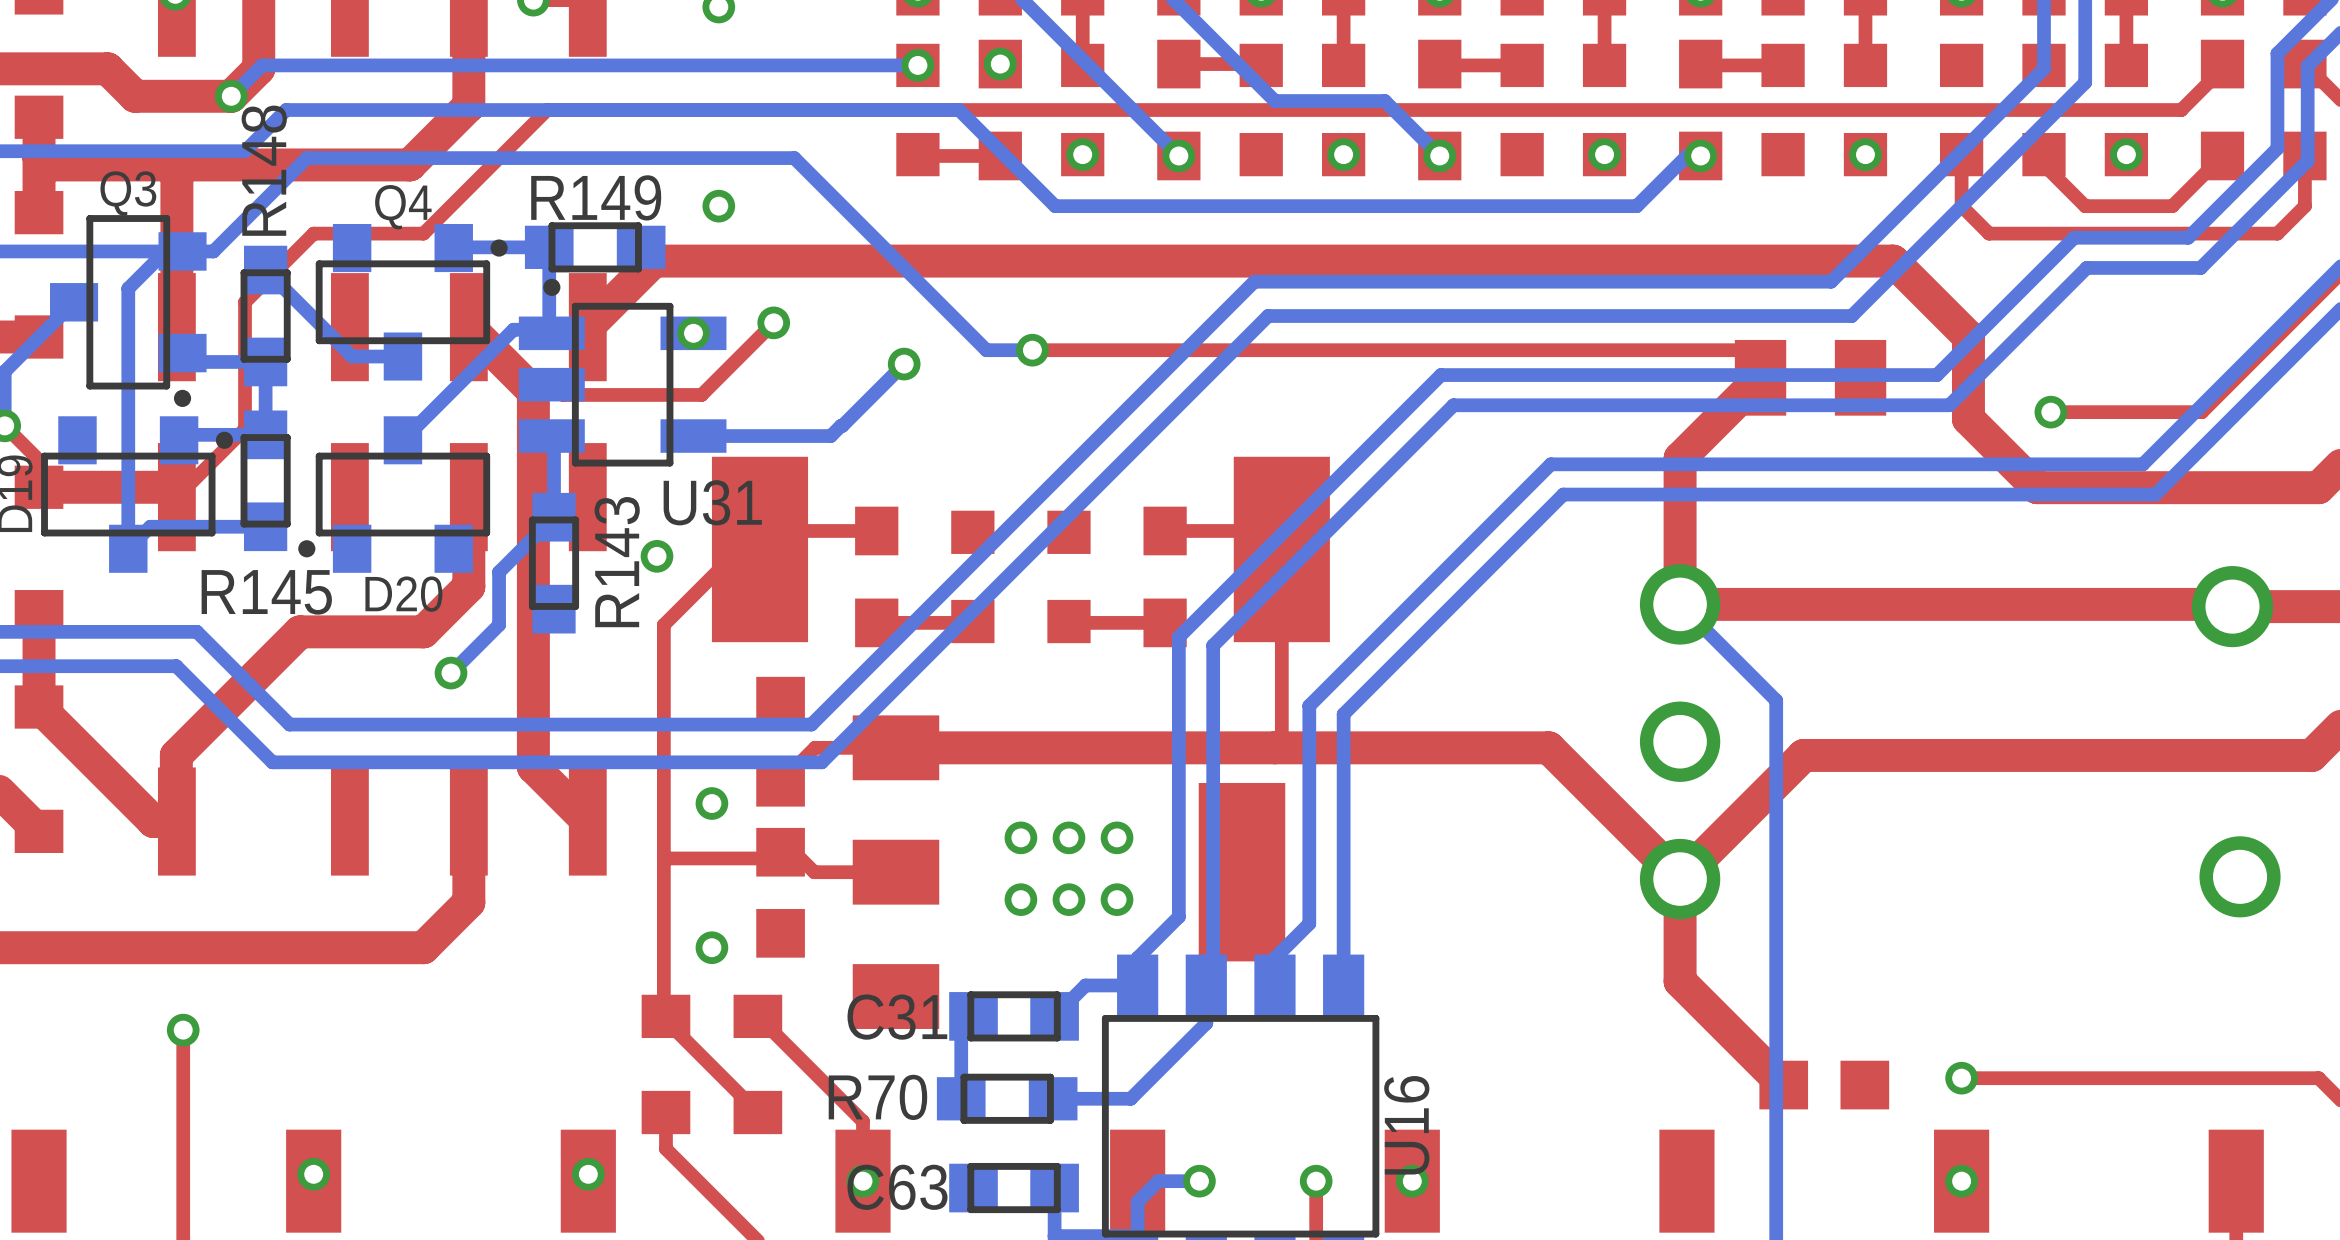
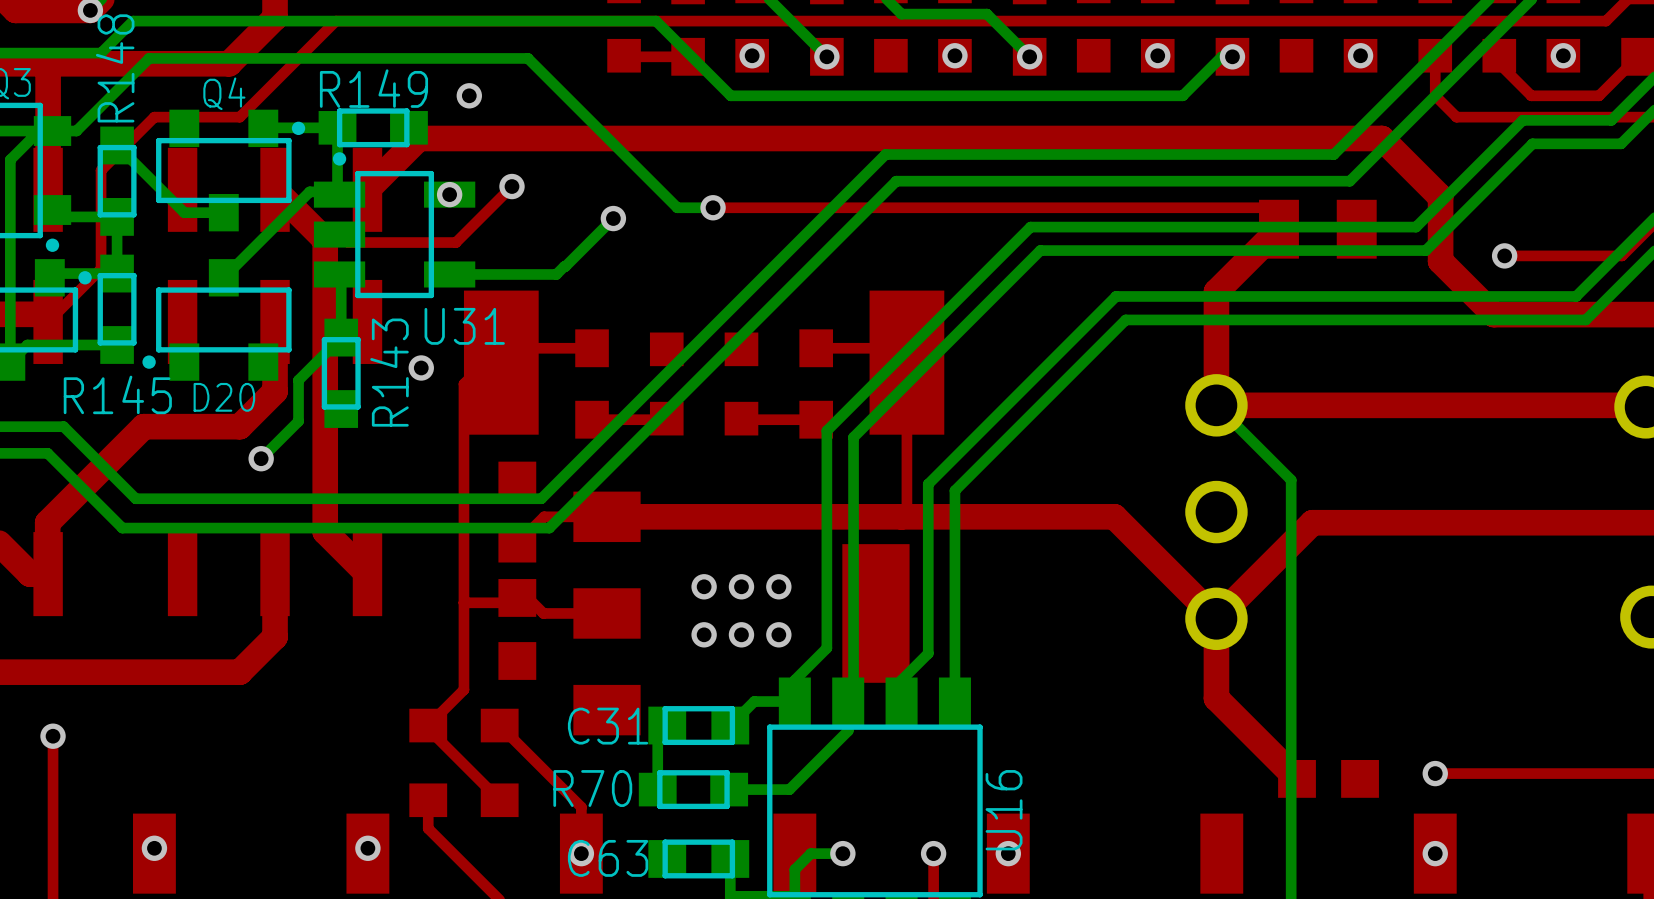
top track: (711, 576) (663, 625) (663, 1014) (665, 1016) -> (463, 383) (463, 689) (428, 725)
via: (711, 803) -> none
top track: (711, 858) (663, 858) -> none
via: (711, 947) -> none

